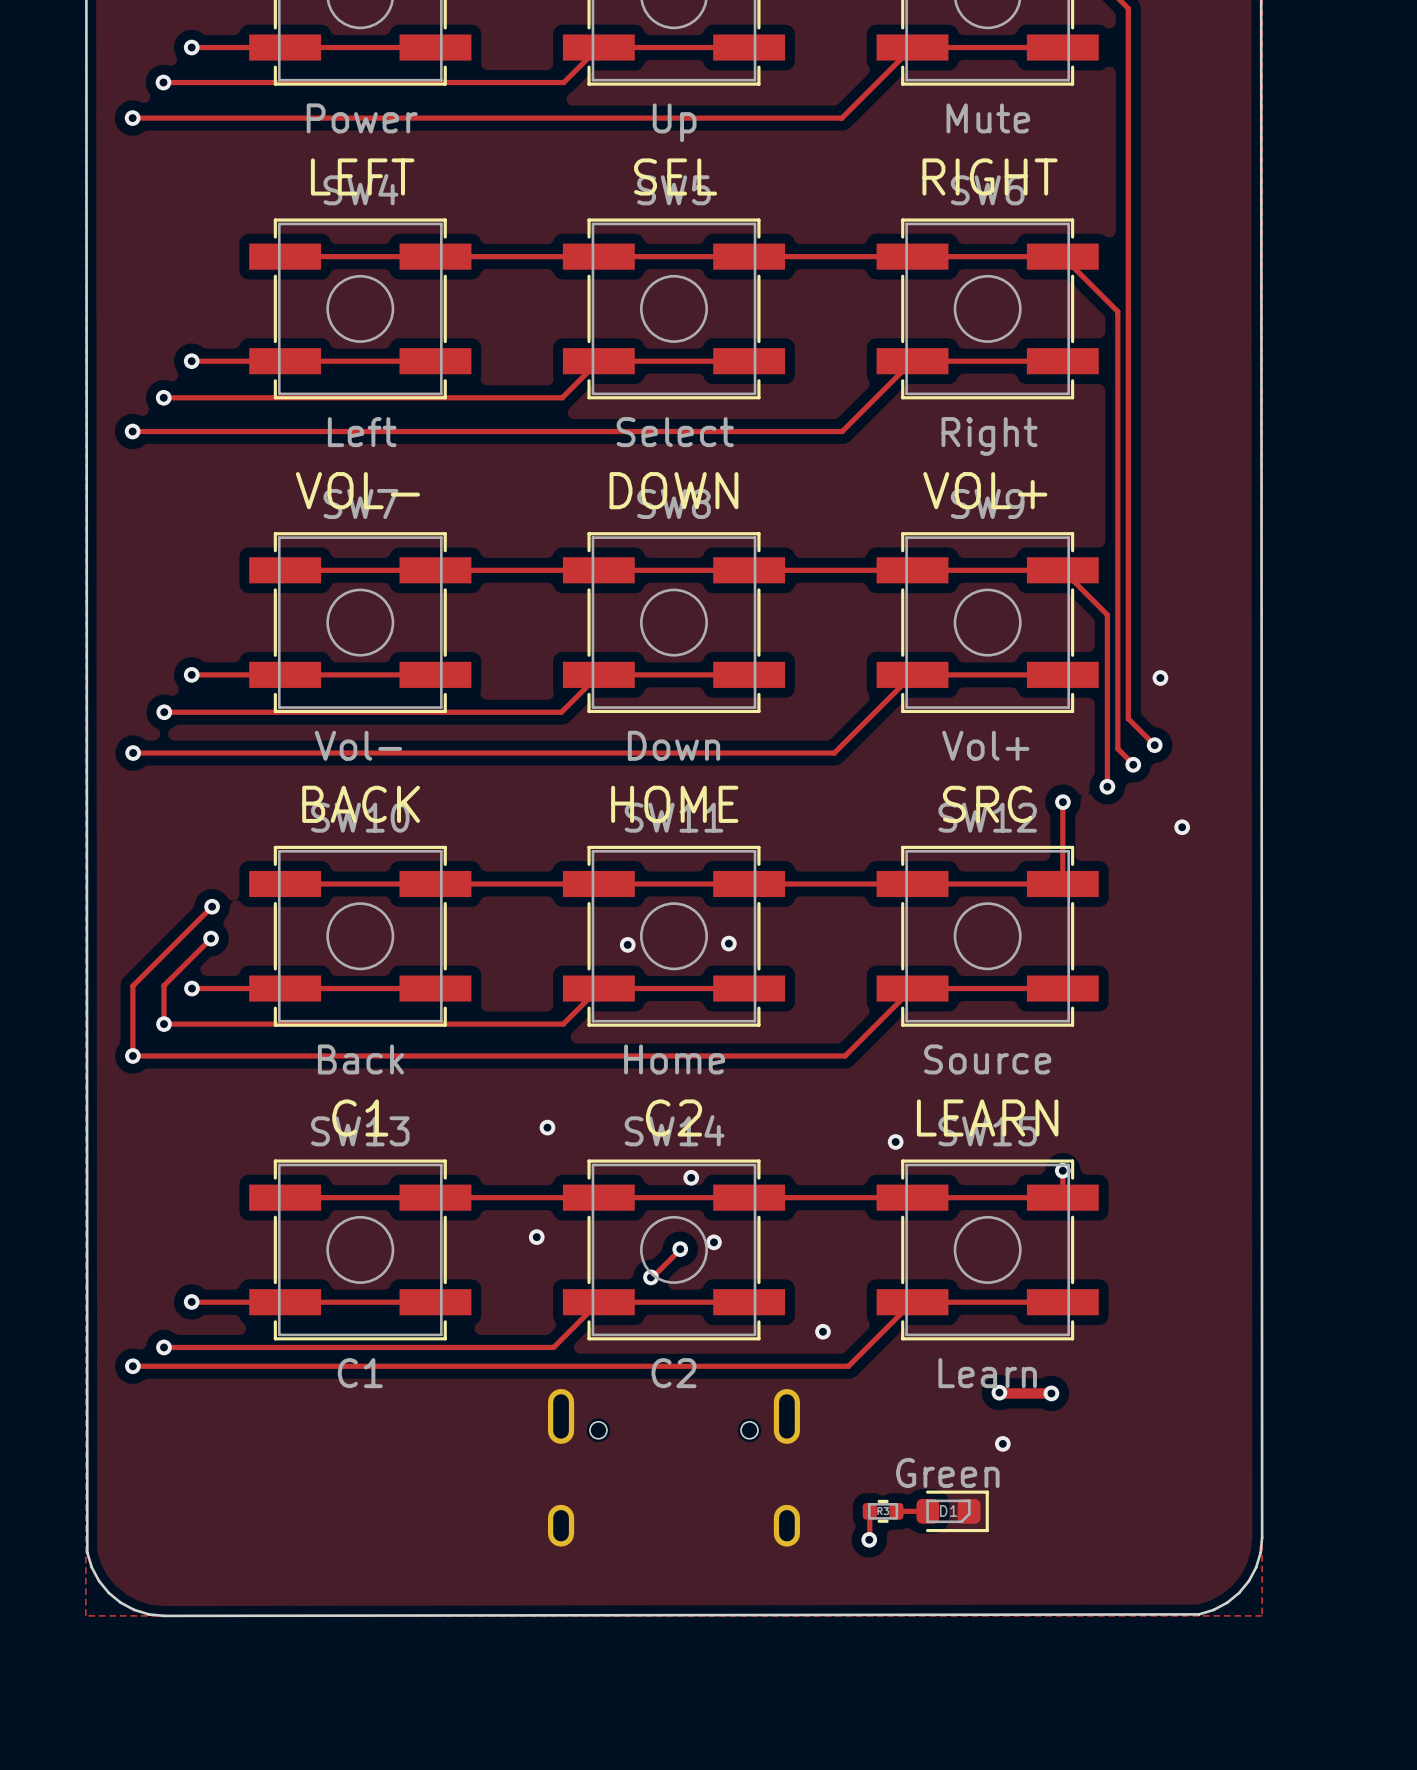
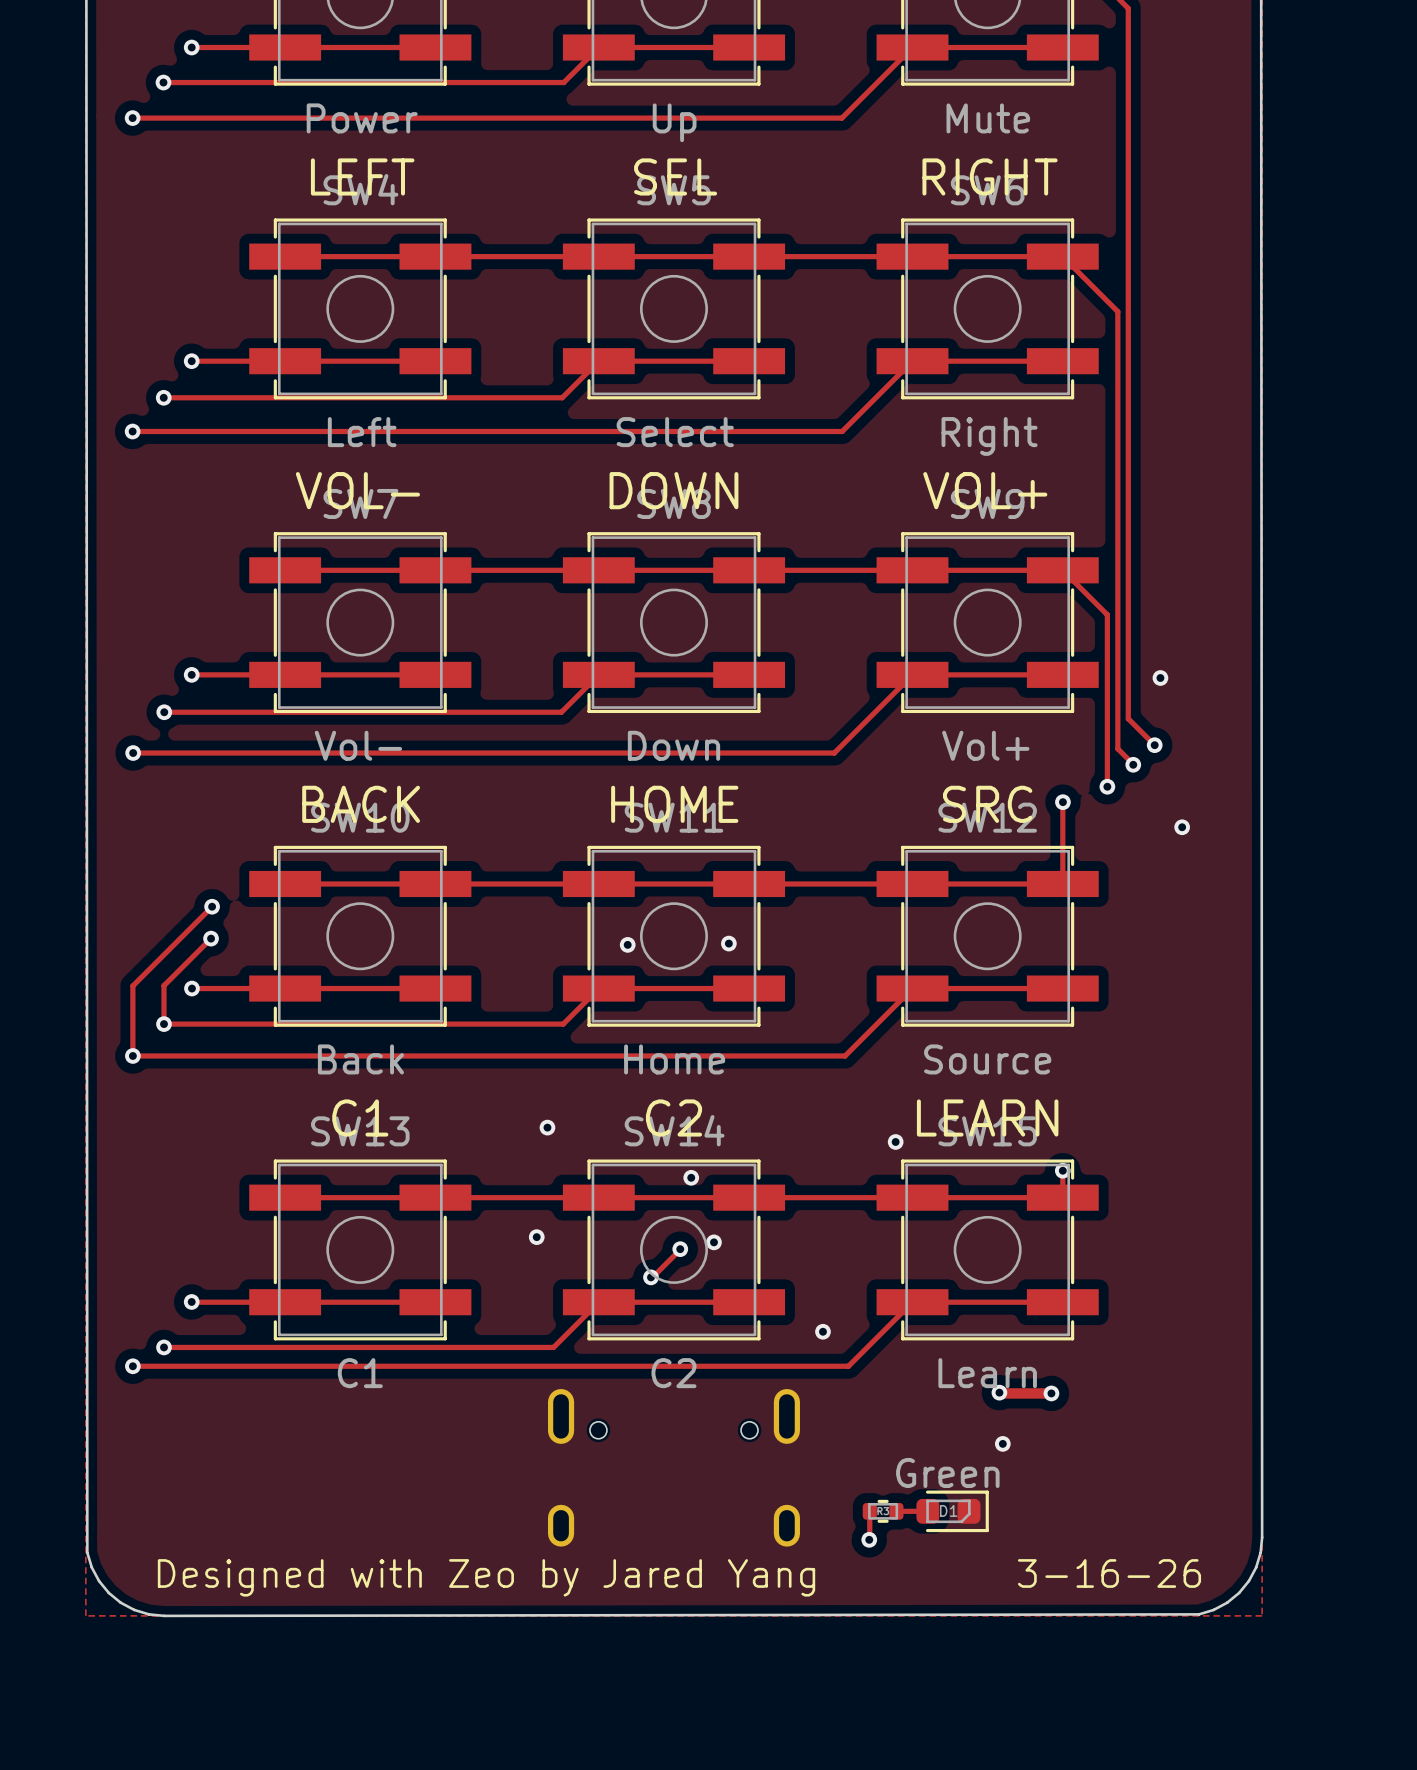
text: none -> 3-16-26 (1109, 1573)
text: none -> Designed with Zeo by Jared Yang (486, 1577)

